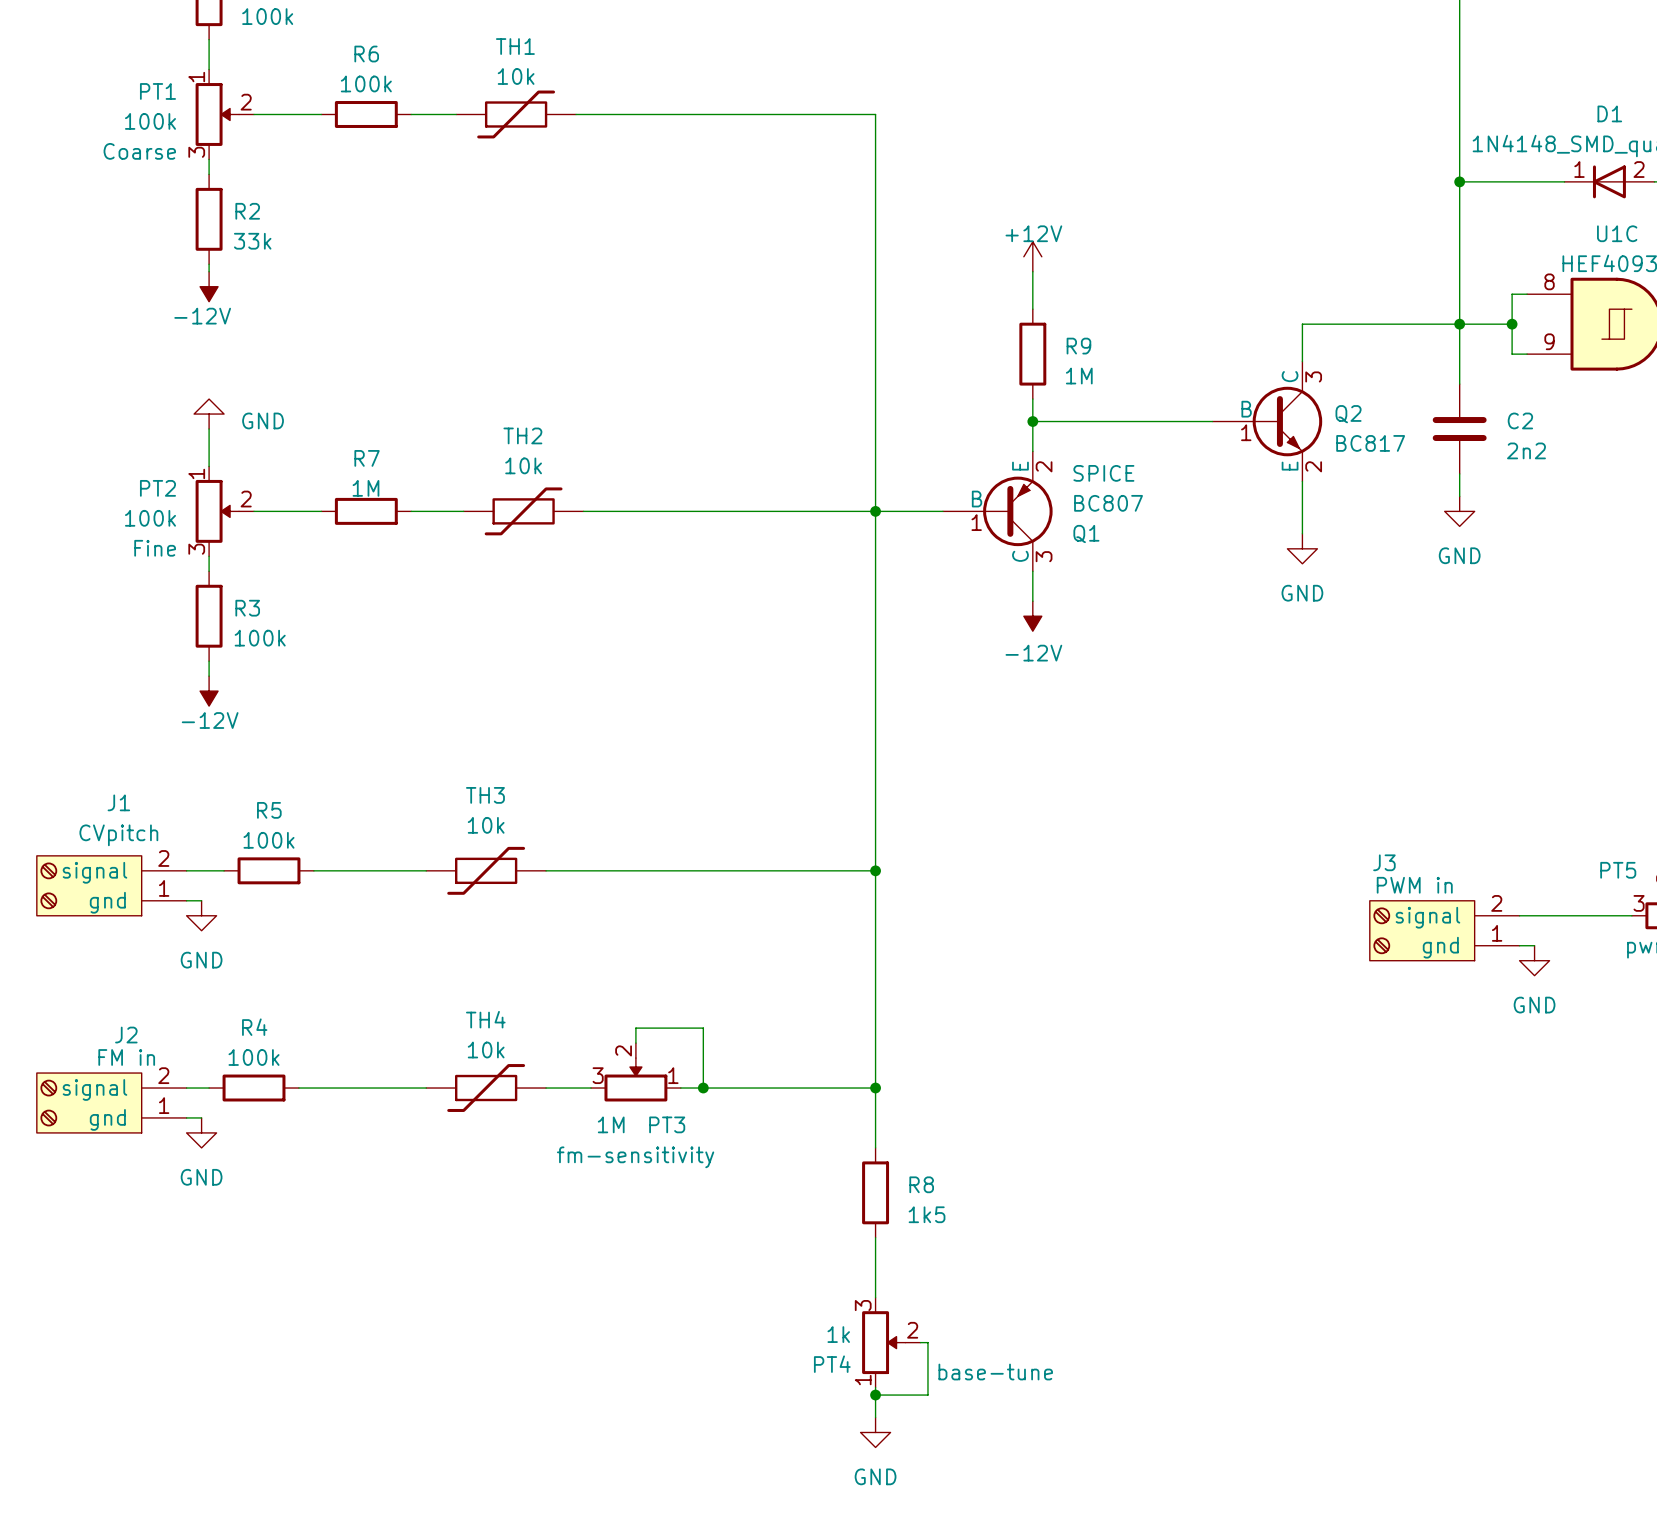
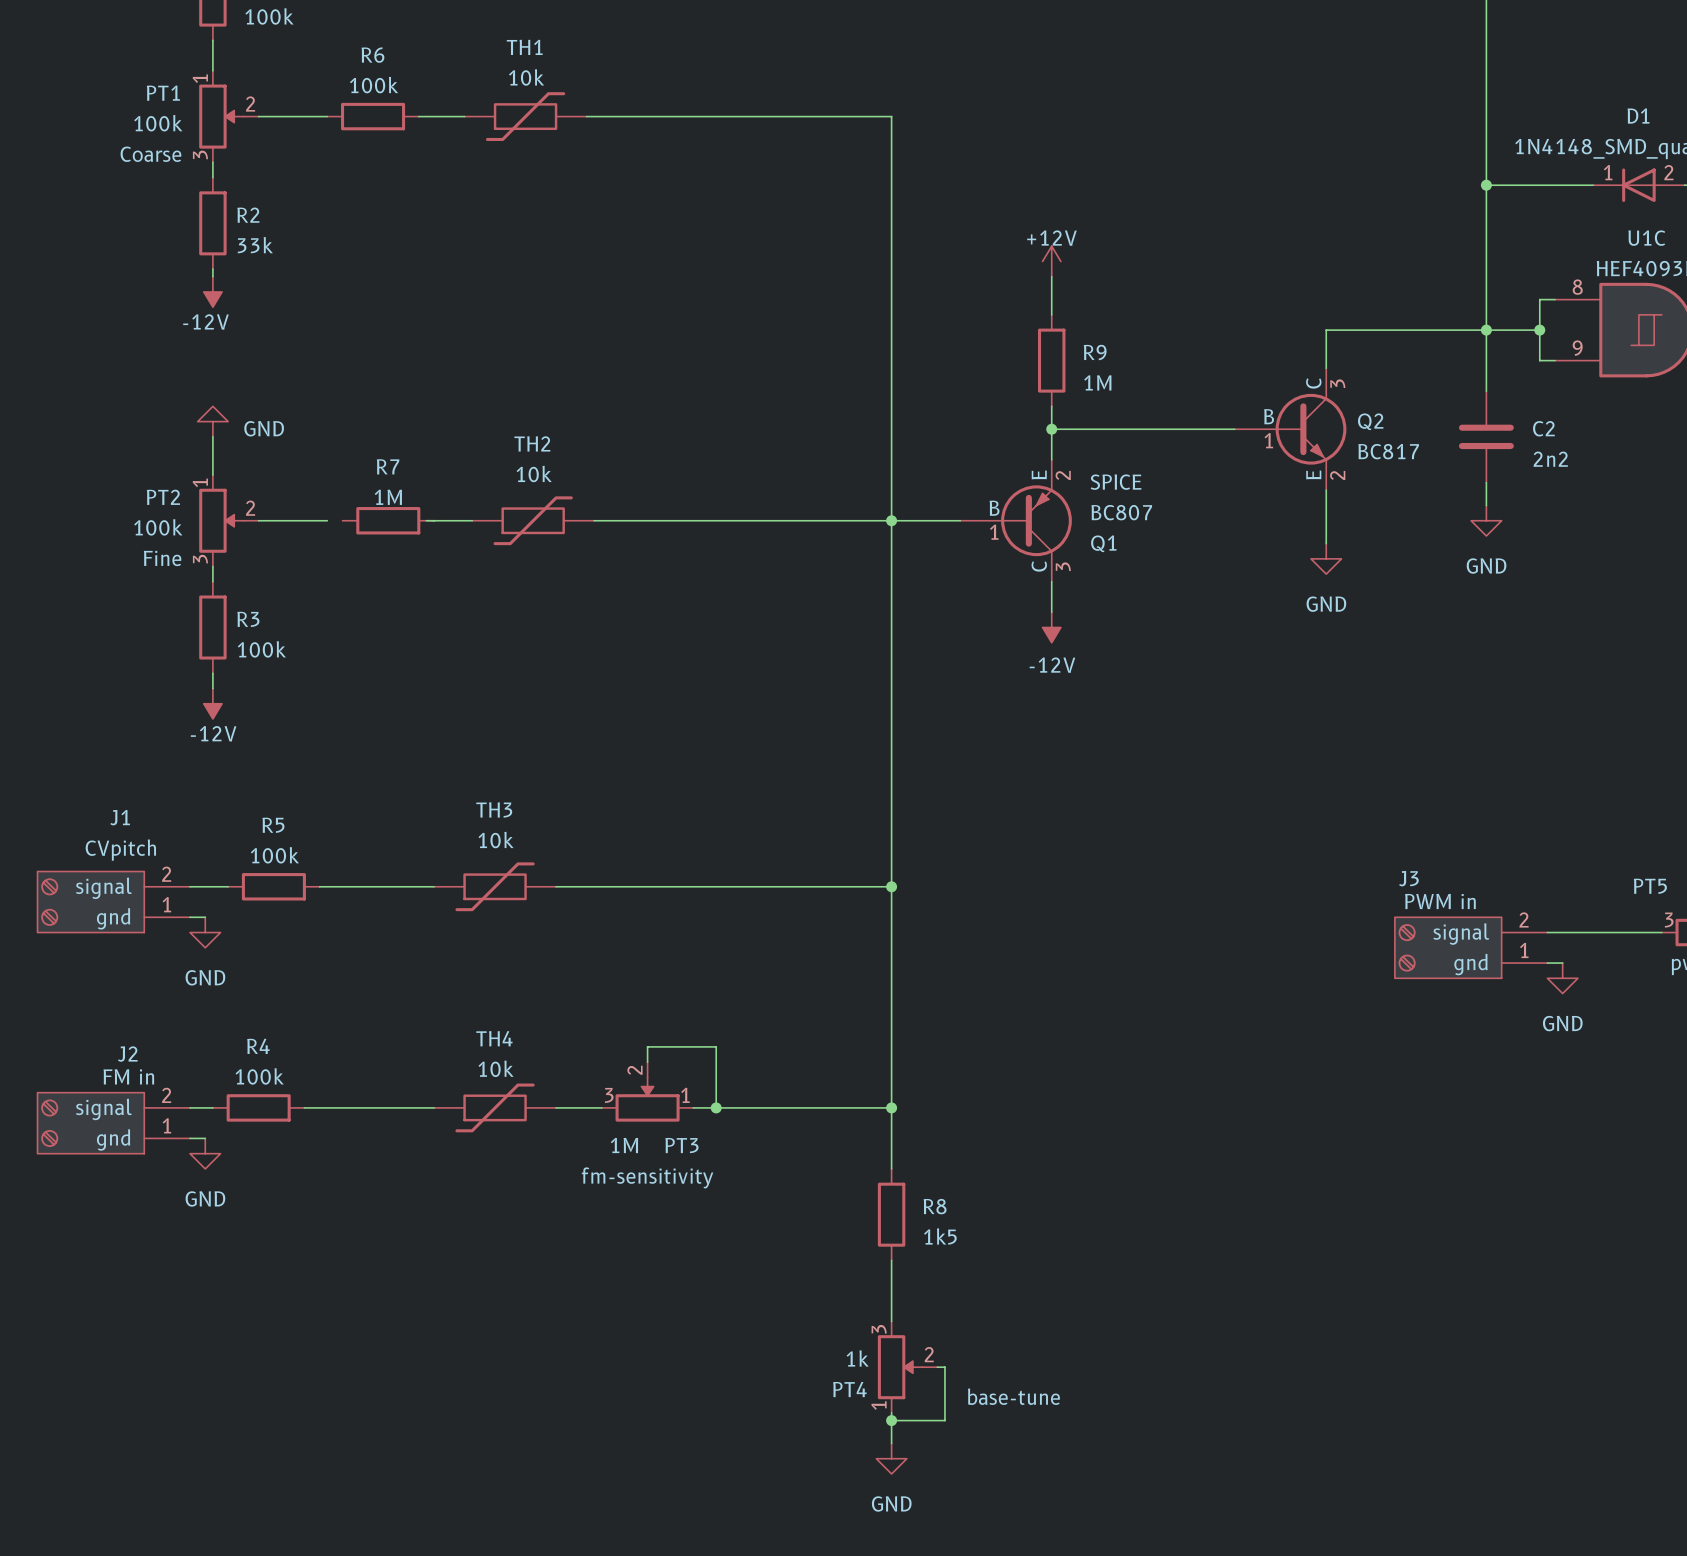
R7 position: (366, 511) -> (388, 520)

